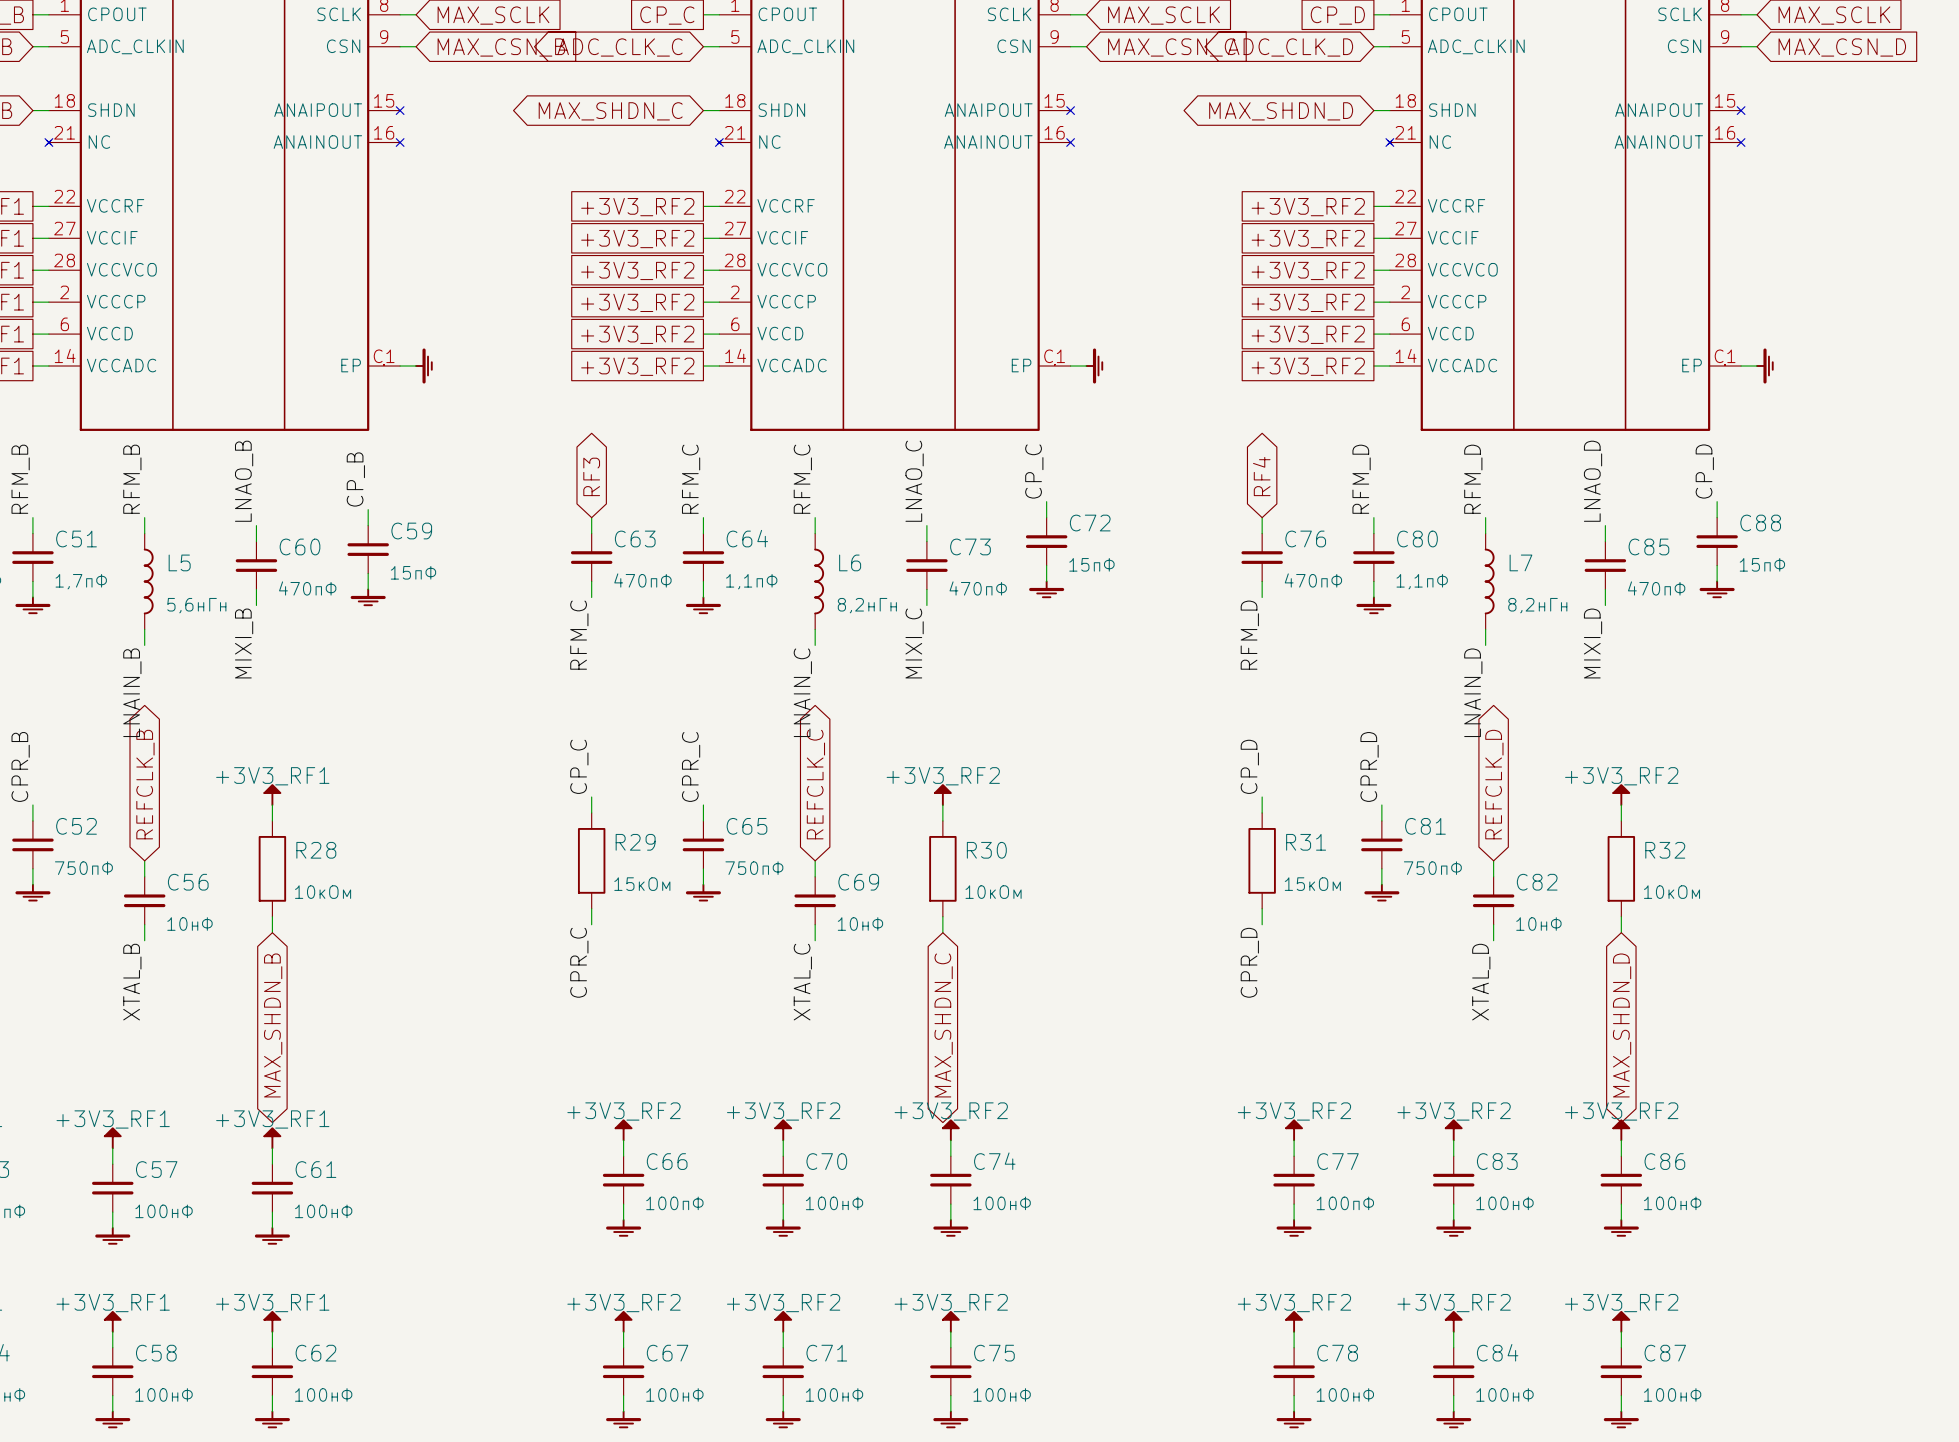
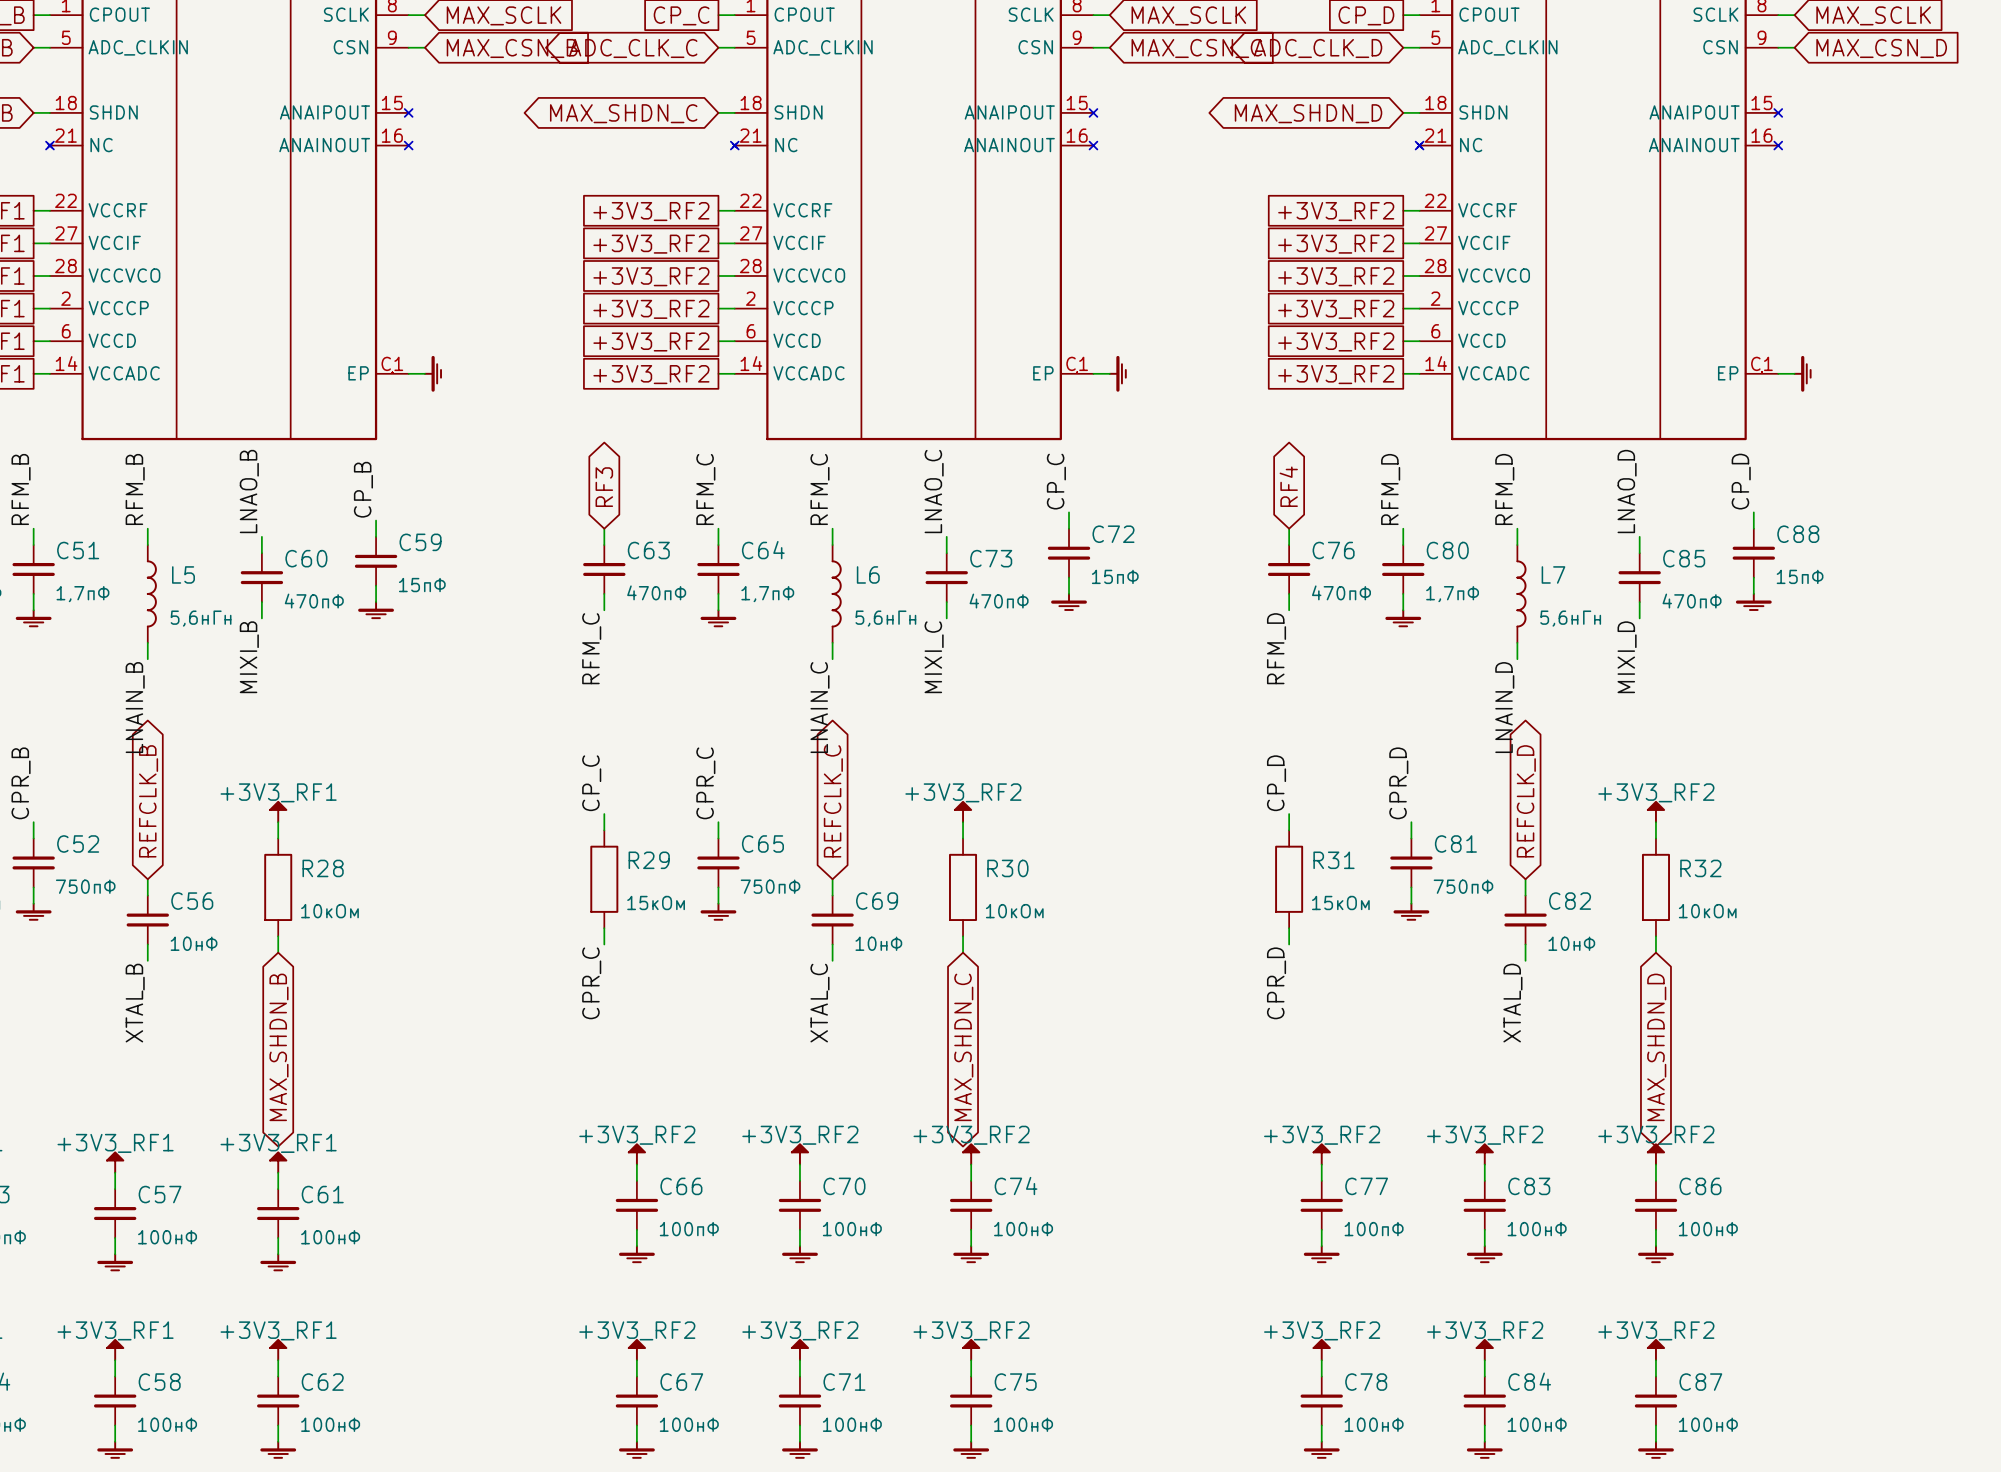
C64 value: 1,1пФ (751, 581) -> 1,7пФ (767, 594)
C80 value: 1,1пФ (1422, 581) -> 1,7пФ (1452, 594)
L6 value: 8,2нГн (867, 605) -> 5,6нГн (885, 618)
L7 value: 8,2нГн (1537, 605) -> 5,6нГн (1570, 618)

